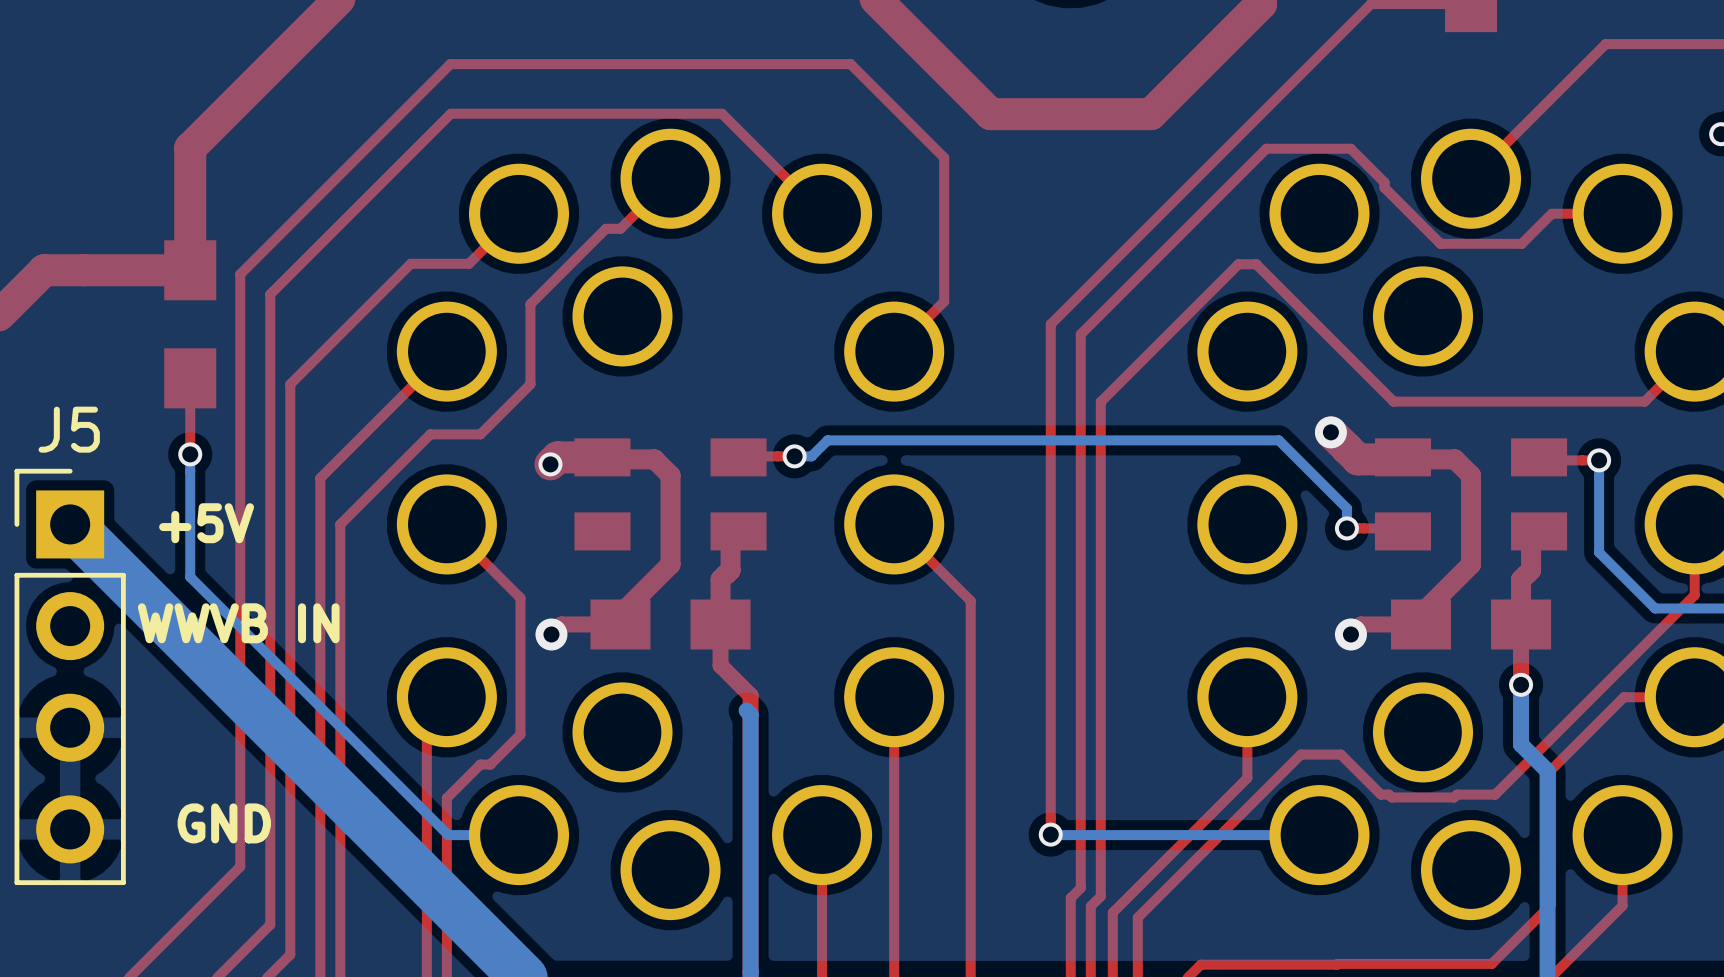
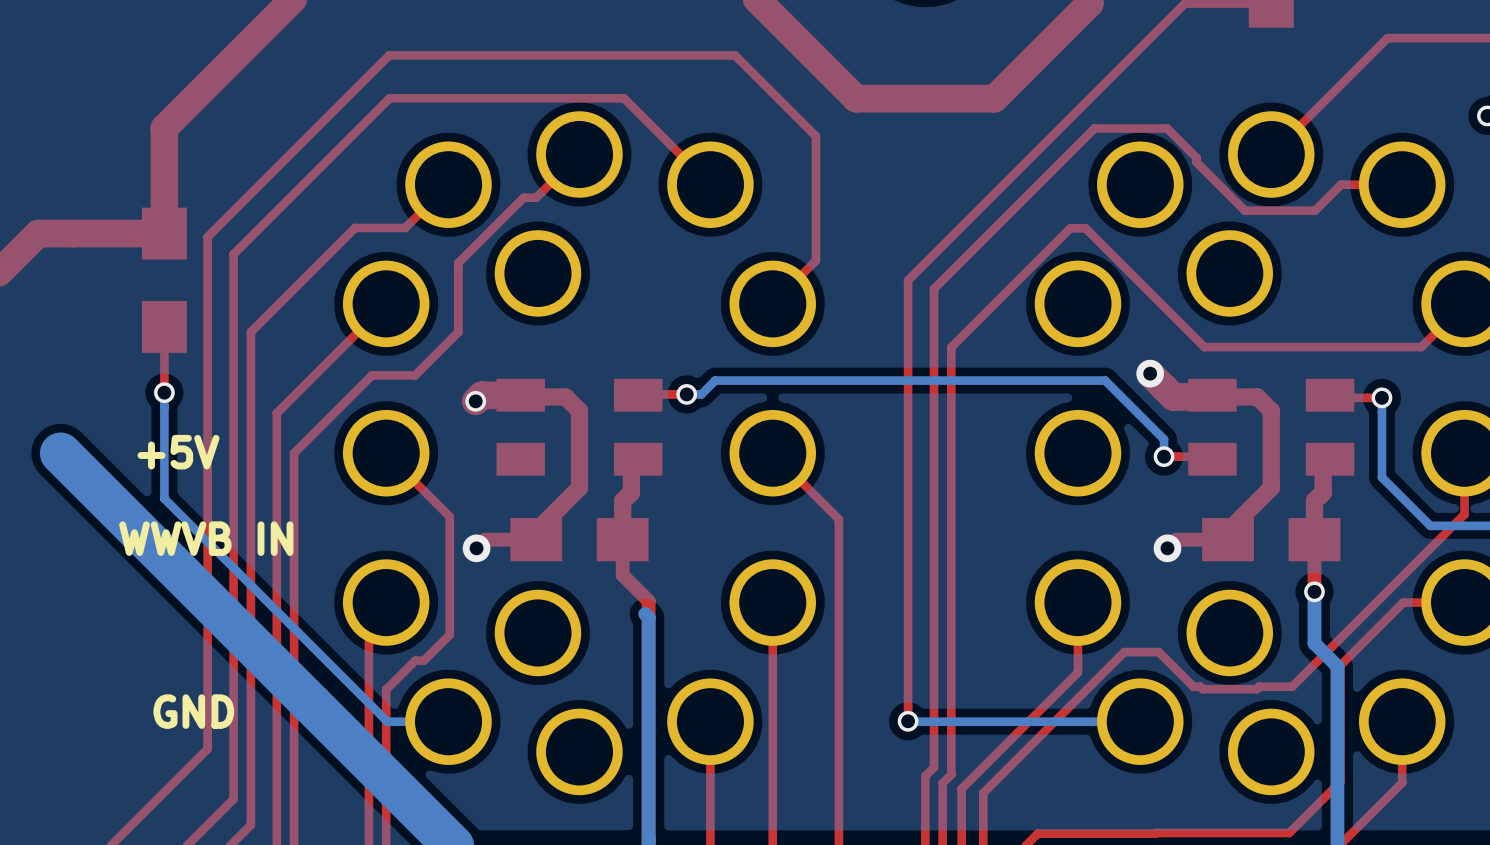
J5: (70, 676) -> none

